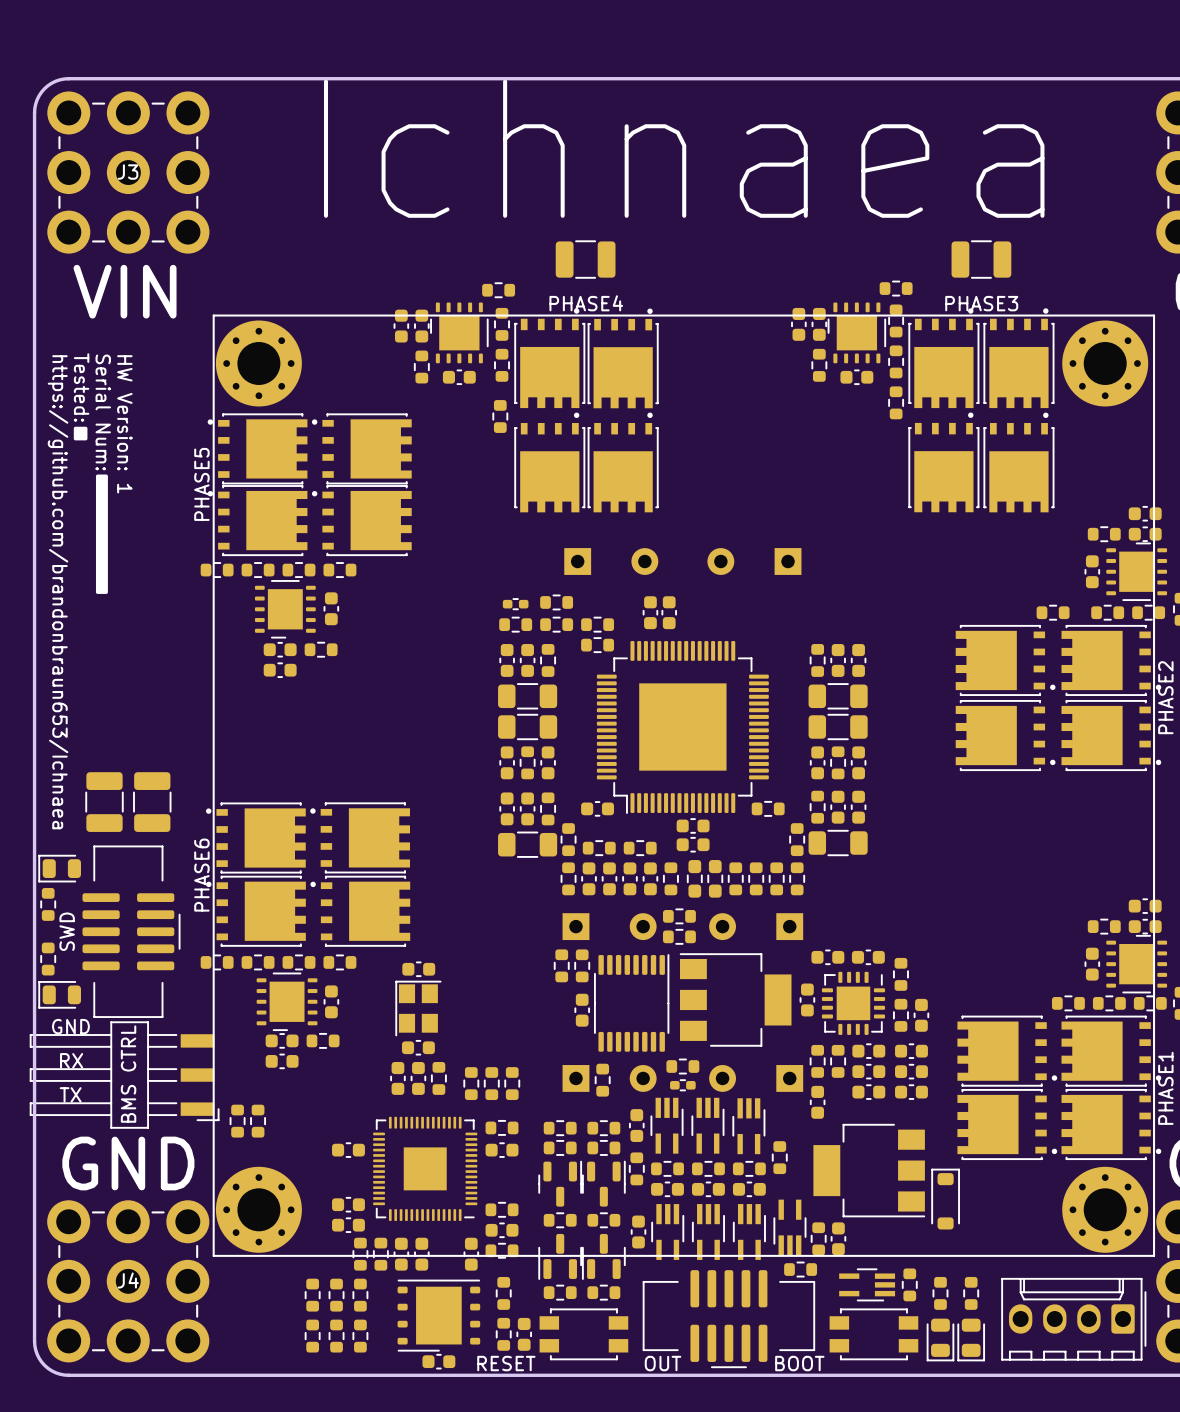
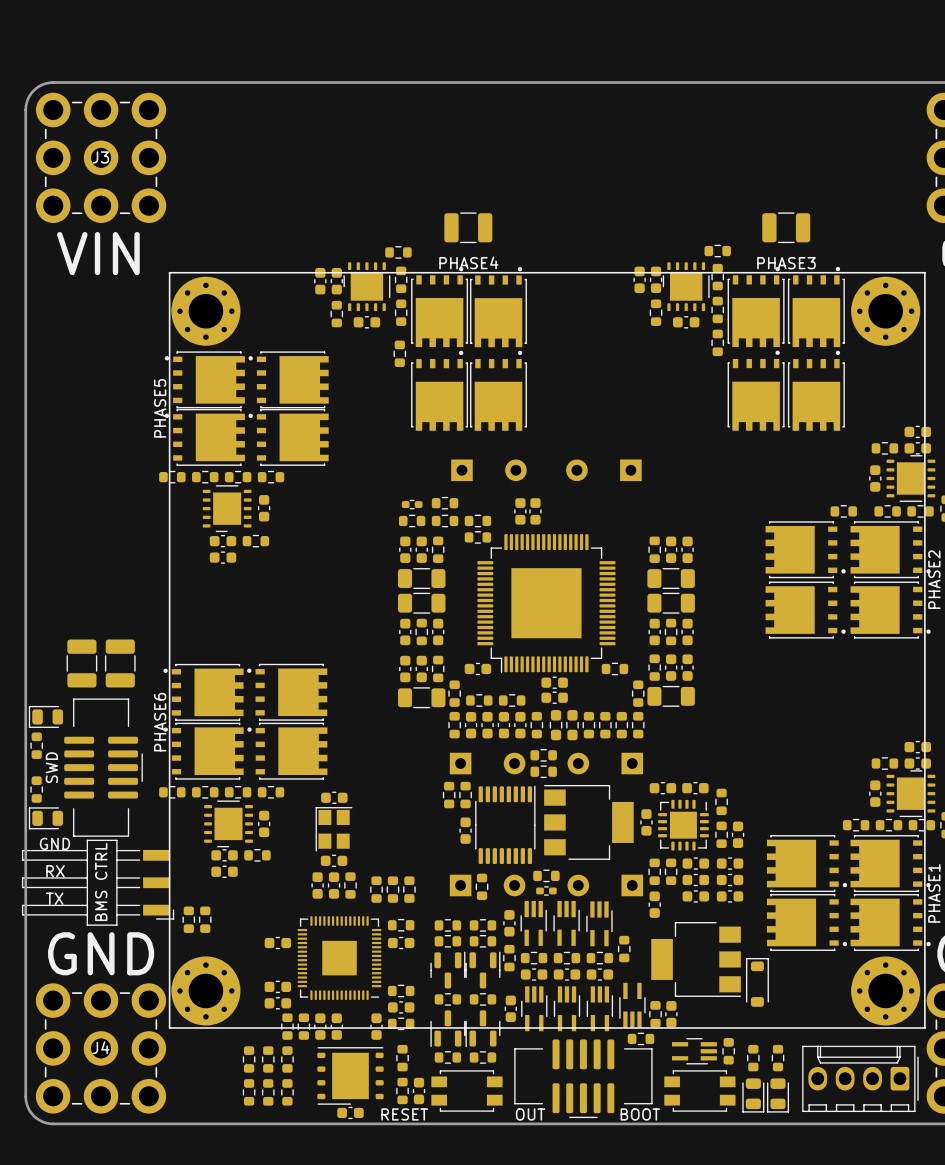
text: Ichnaea (684, 148) -> none
text: Tested: (81, 387) -> none
text: Serial Num: (103, 412) -> none
text: HW Version: 1 (124, 424) -> none
drawing: [73, 426, 88, 441] -> none
drawing: [95, 474, 108, 594] -> none
text: https://github.com/brandonbraun653/Ichnaea (58, 592) -> none

